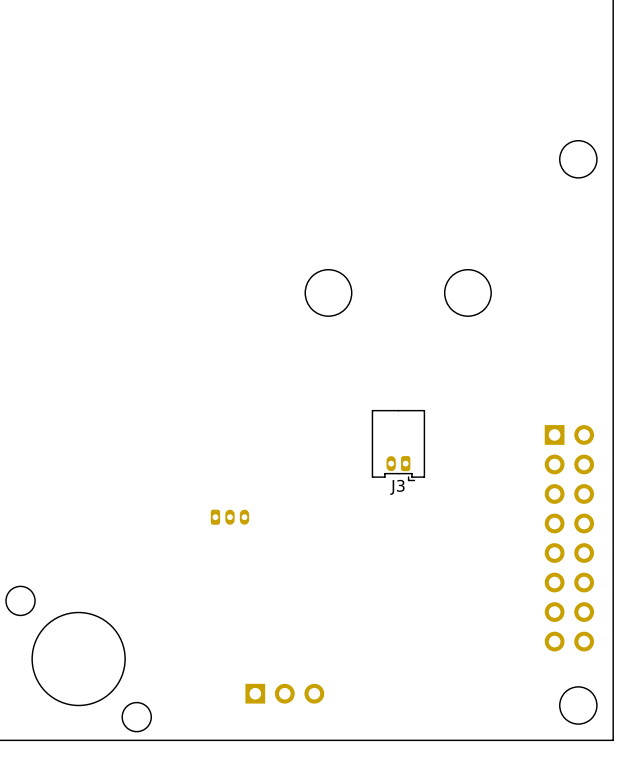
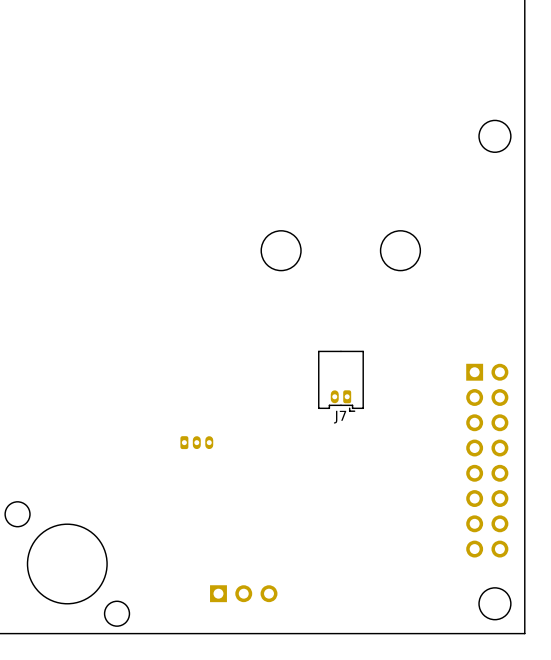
J3 name: J3 (397, 487) -> J7 (340, 417)

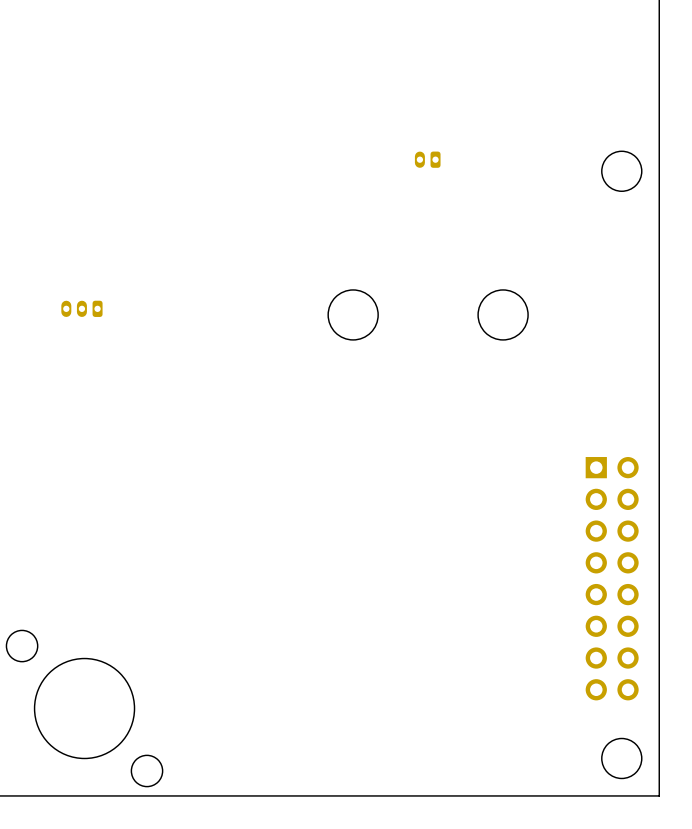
part: none -> (427, 159)
J7: (340, 381) -> none
part rotation: 0° (196, 442) -> 180° (81, 308)
part position: (196, 442) -> (81, 308)
part: (243, 593) -> none

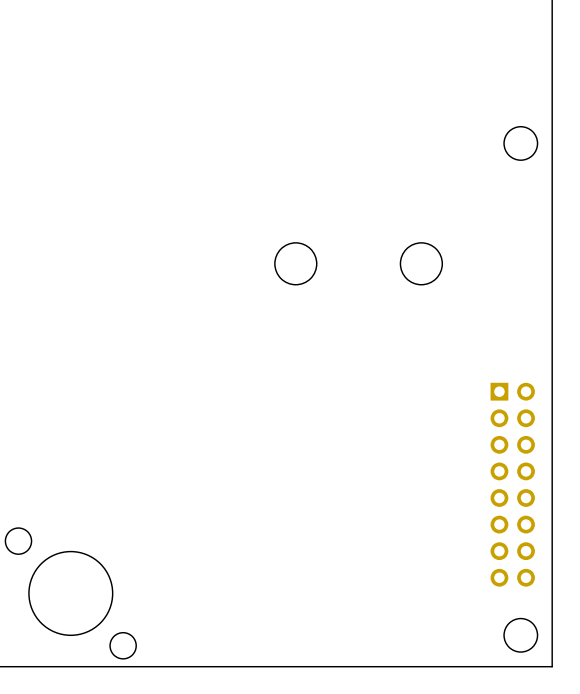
part: (427, 159) -> none
part: (81, 308) -> none

